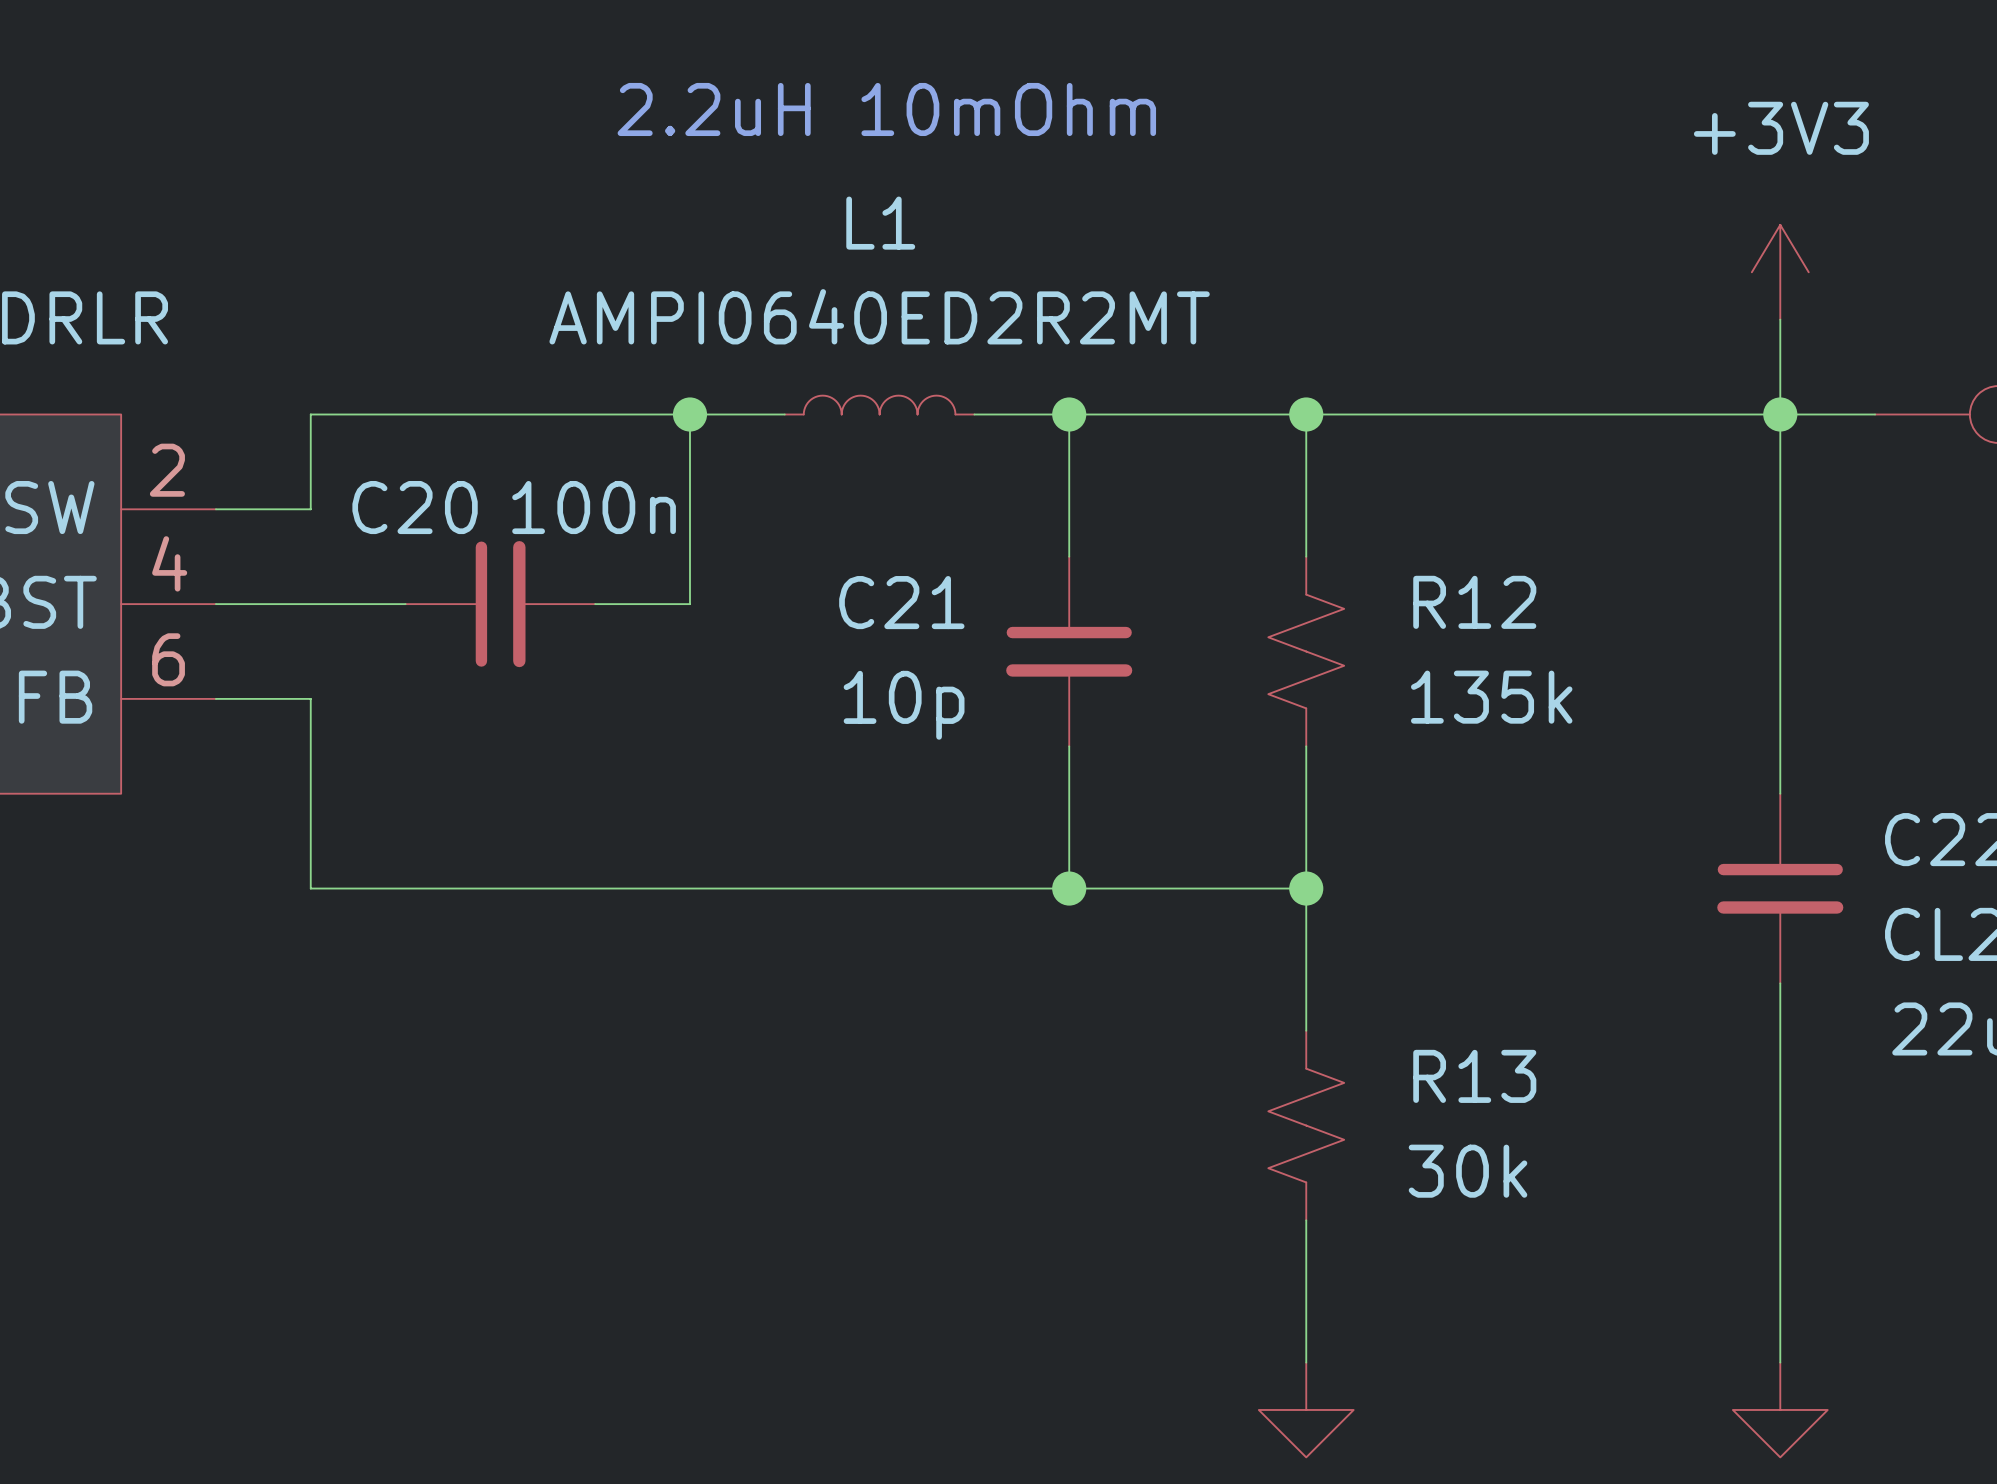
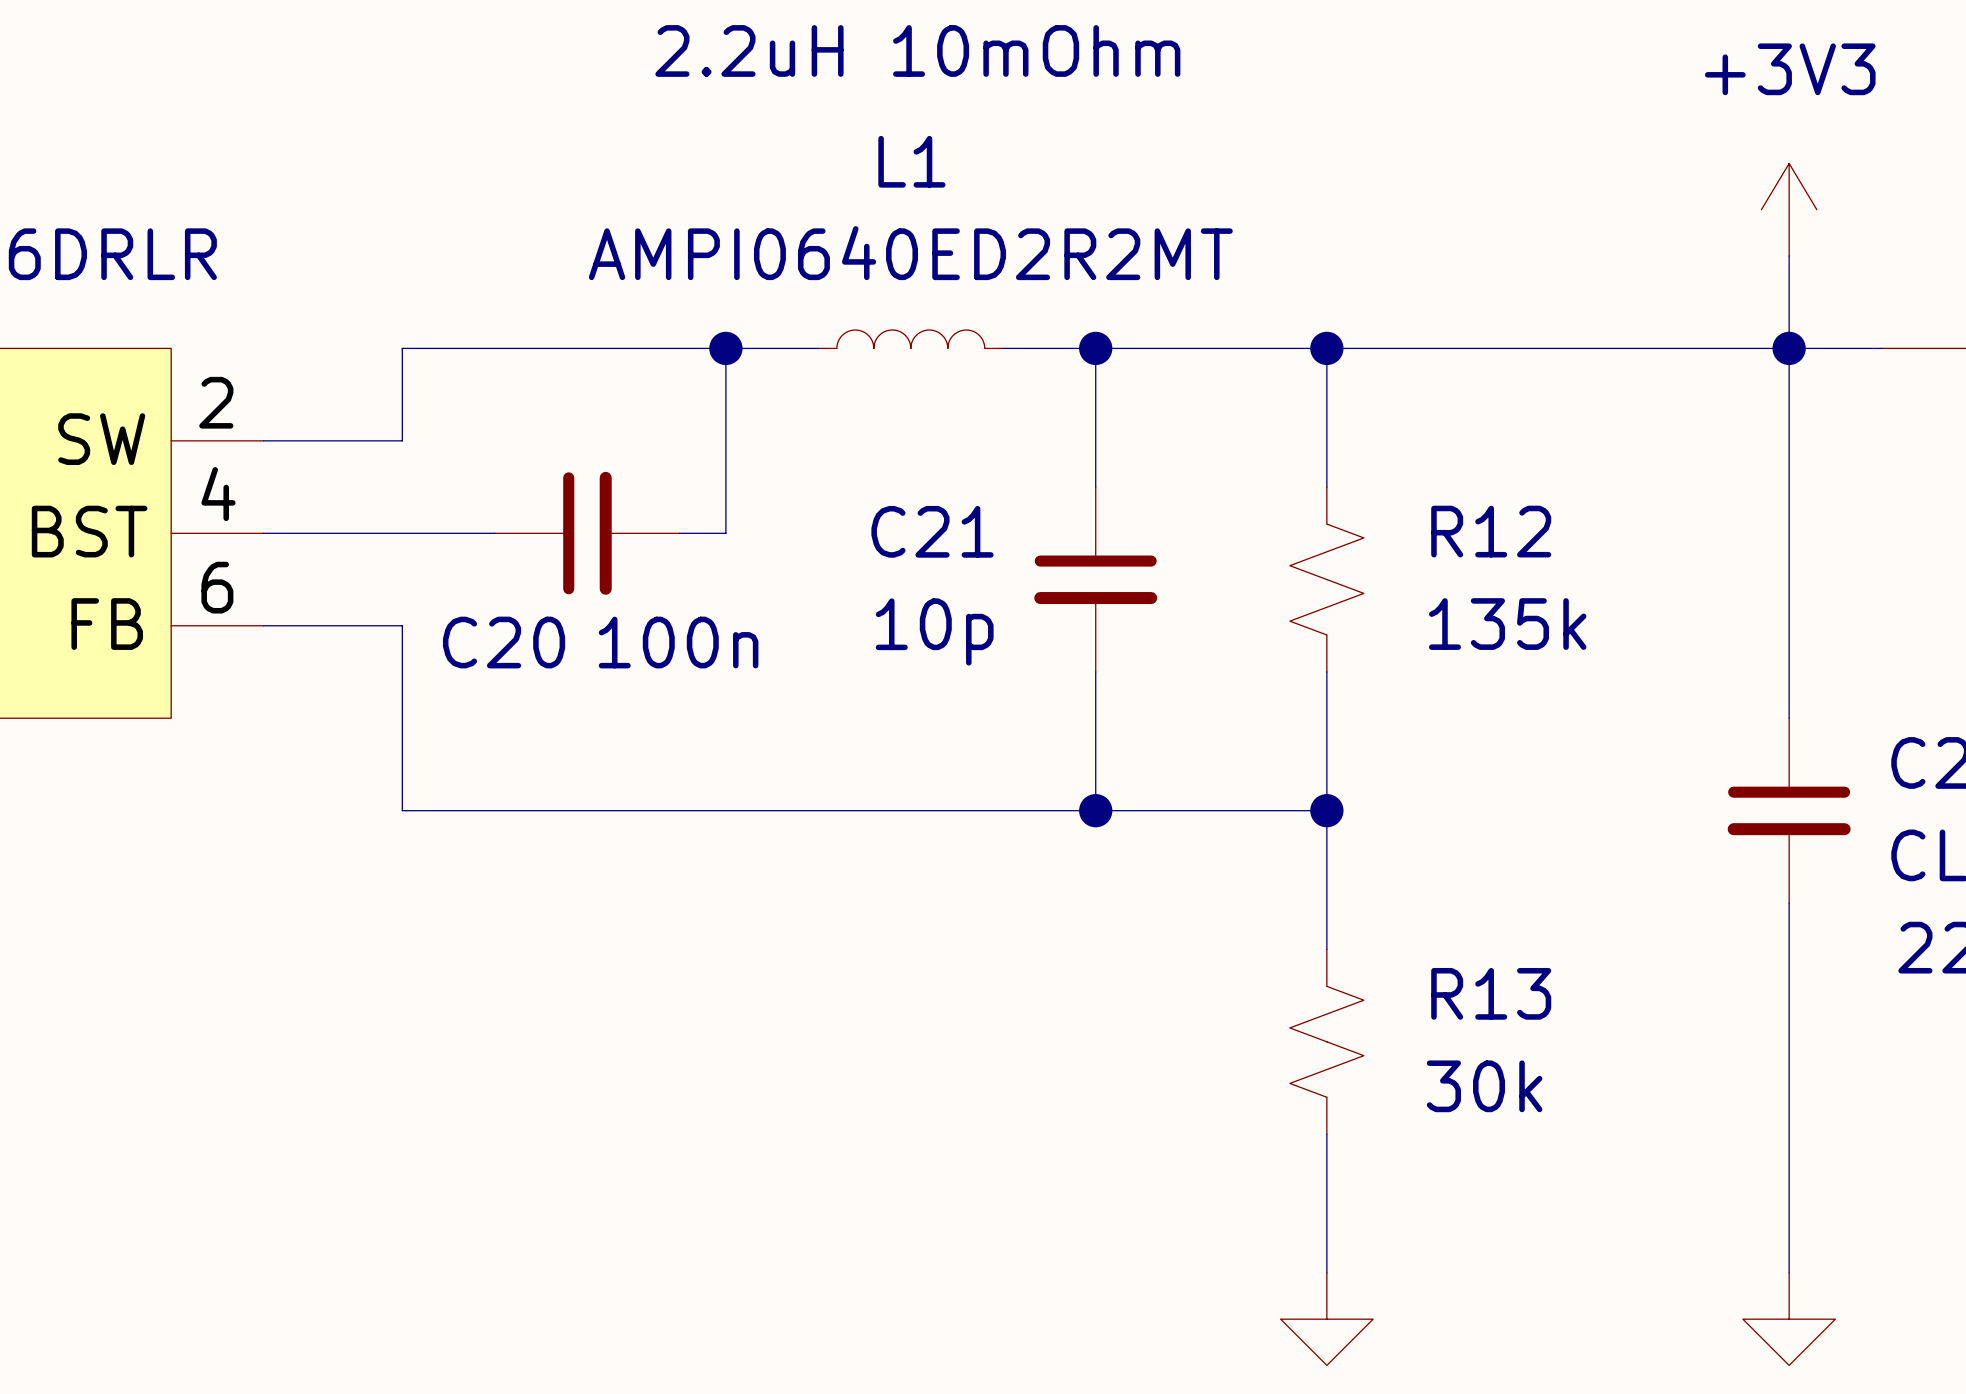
wire: (358, 414) (310, 414) (310, 509) -> (402, 348) (402, 440) (356, 440)
C20 name position: C20 (415, 507) -> C20 (504, 642)
C20 value position: 100n (594, 507) -> 100n (678, 642)
C20 position: (500, 604) -> (587, 533)
wire: (310, 698) (310, 888) (358, 888) -> (356, 625) (402, 625) (402, 810)

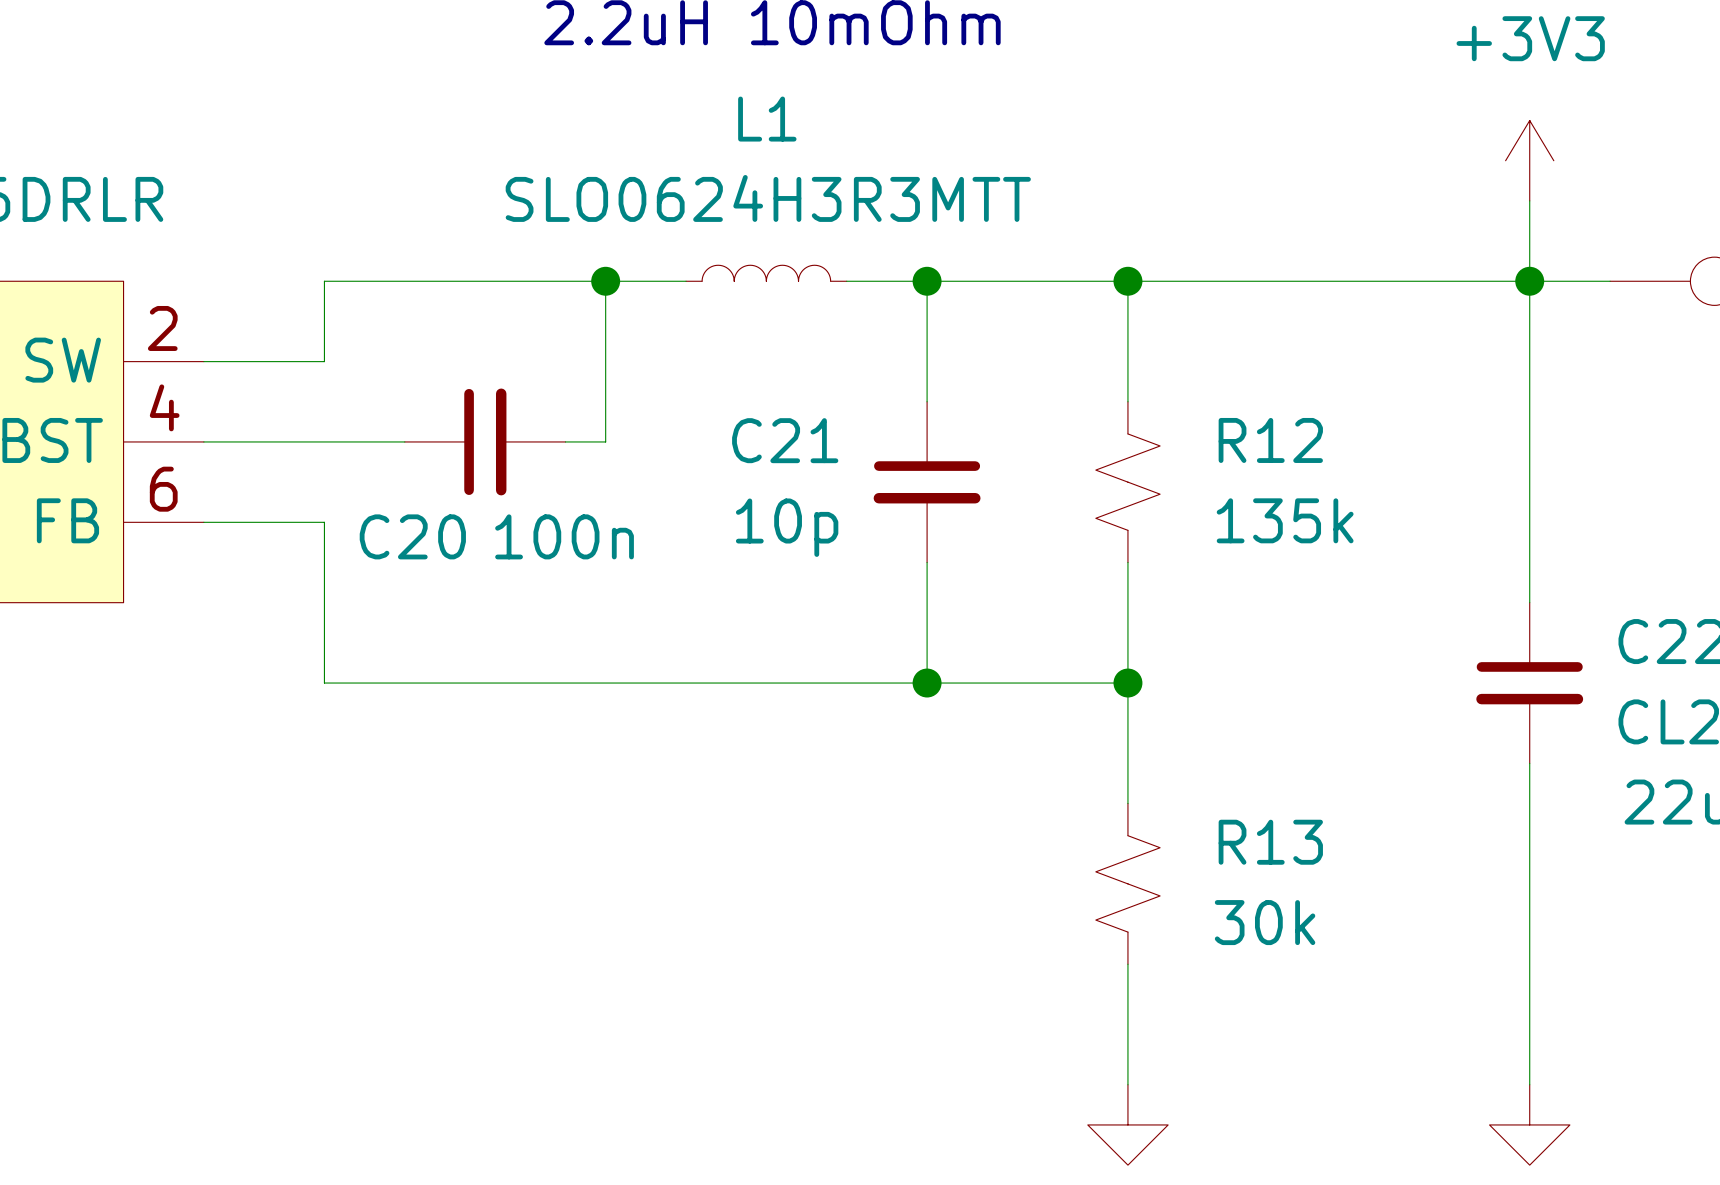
L1 value: AMPI0640ED2R2MT (910, 253) -> SLO0624H3R3MTT (768, 198)

